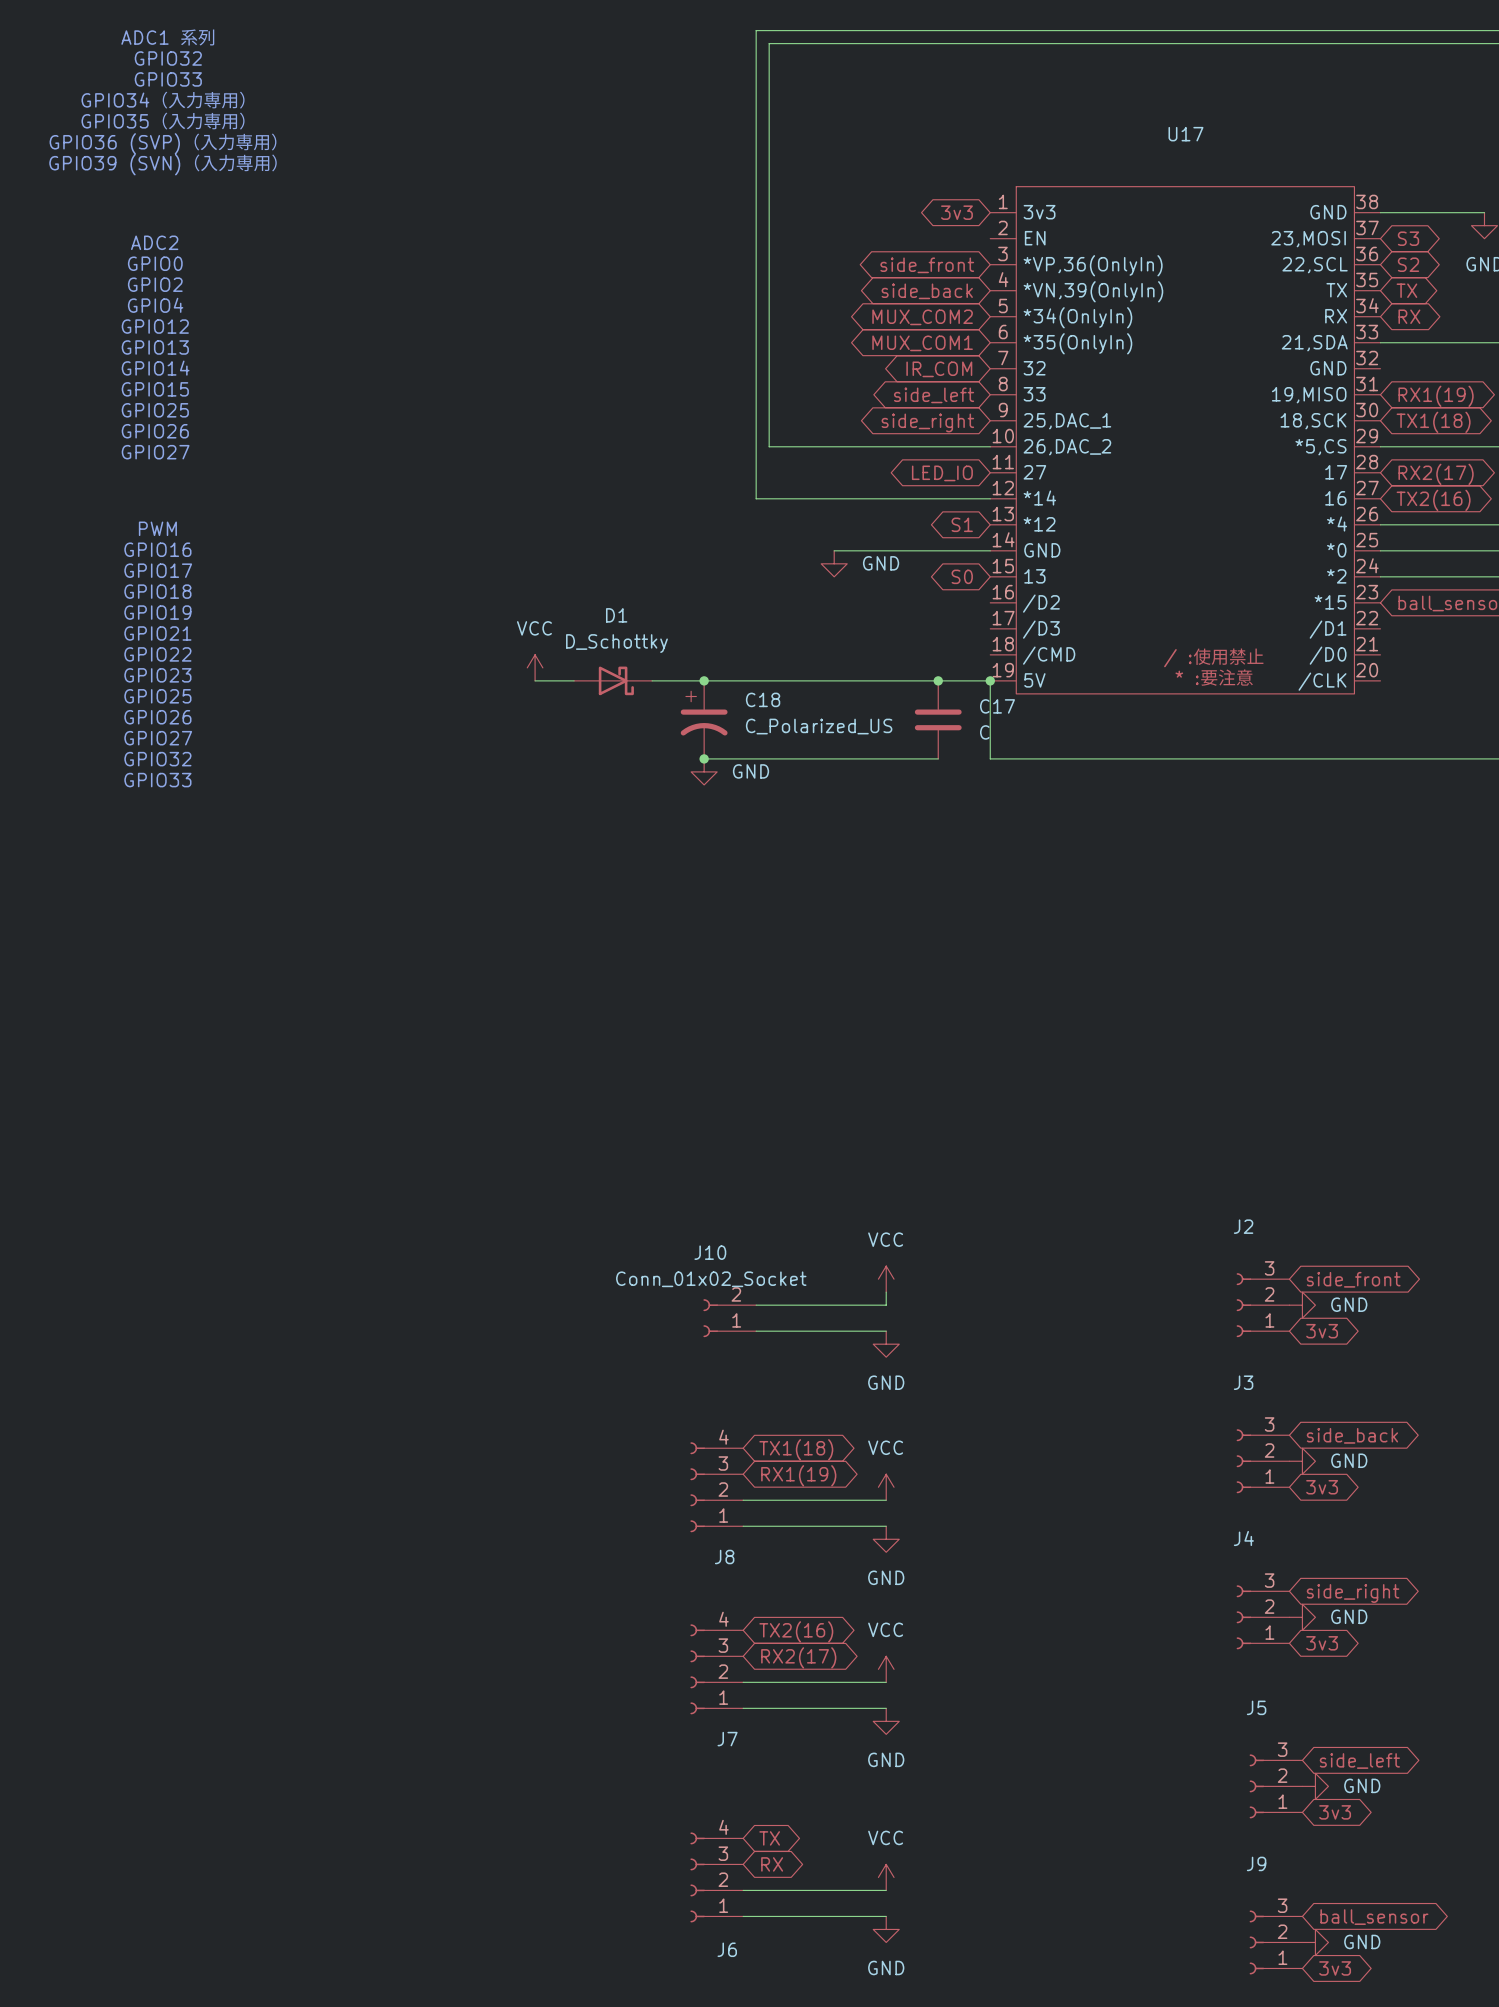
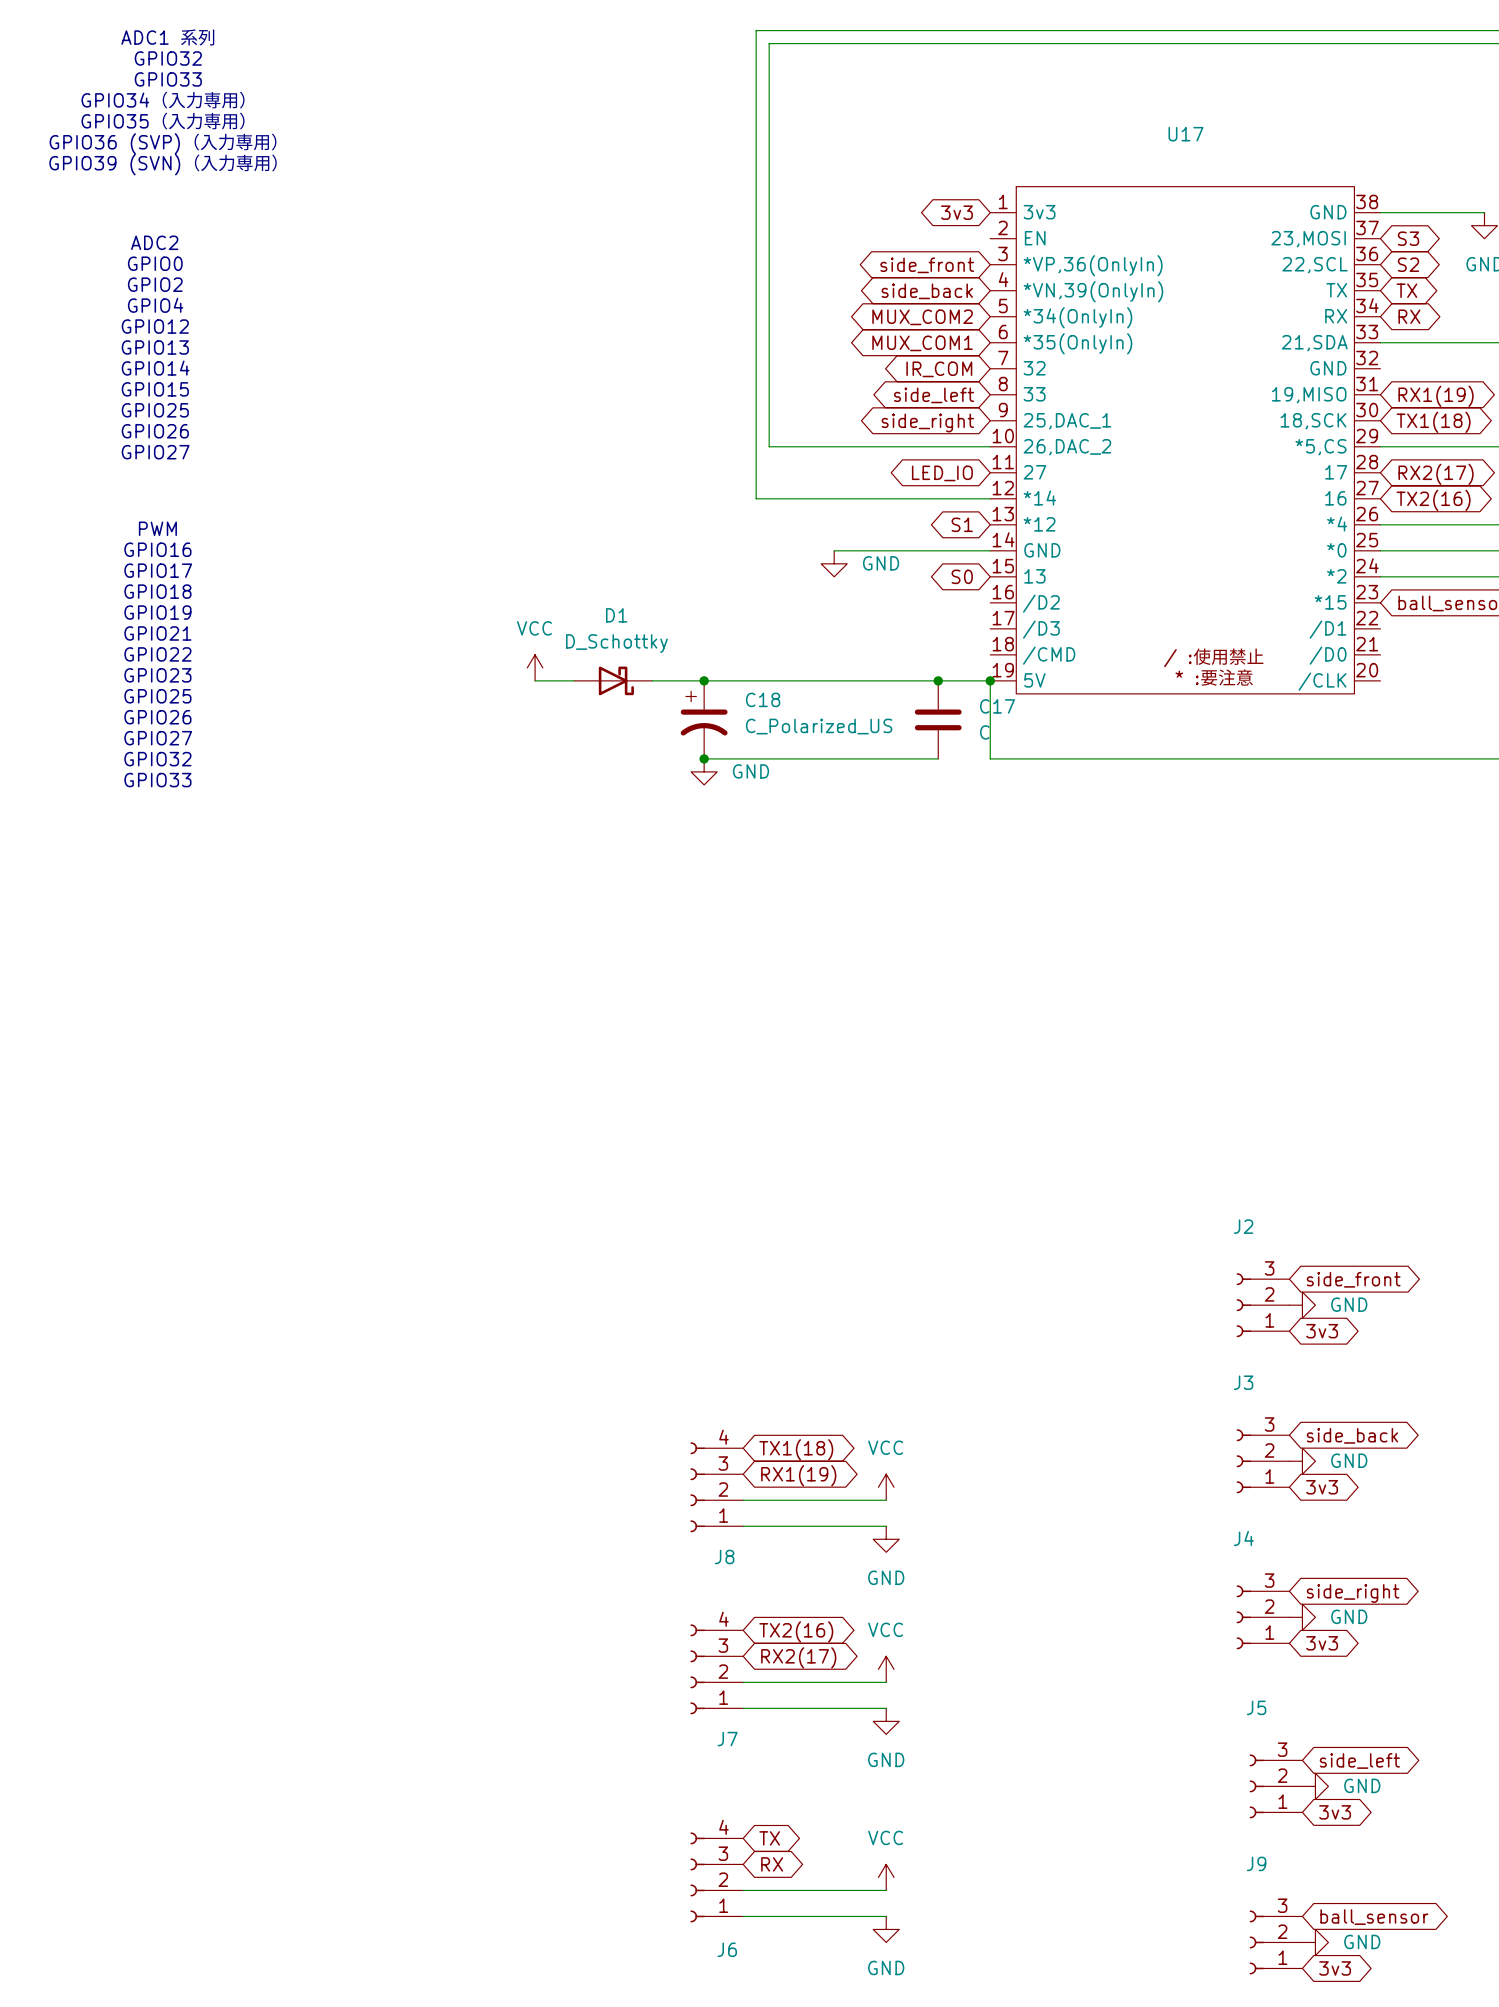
power symbol: VCC (886, 1279) -> none
wire: (886, 1292) (886, 1305) (756, 1305) -> none
J10: Conn_01x02_Socket (729, 1318) -> none
wire: (756, 1331) (886, 1331) -> none
power symbol: GND (886, 1344) -> none

